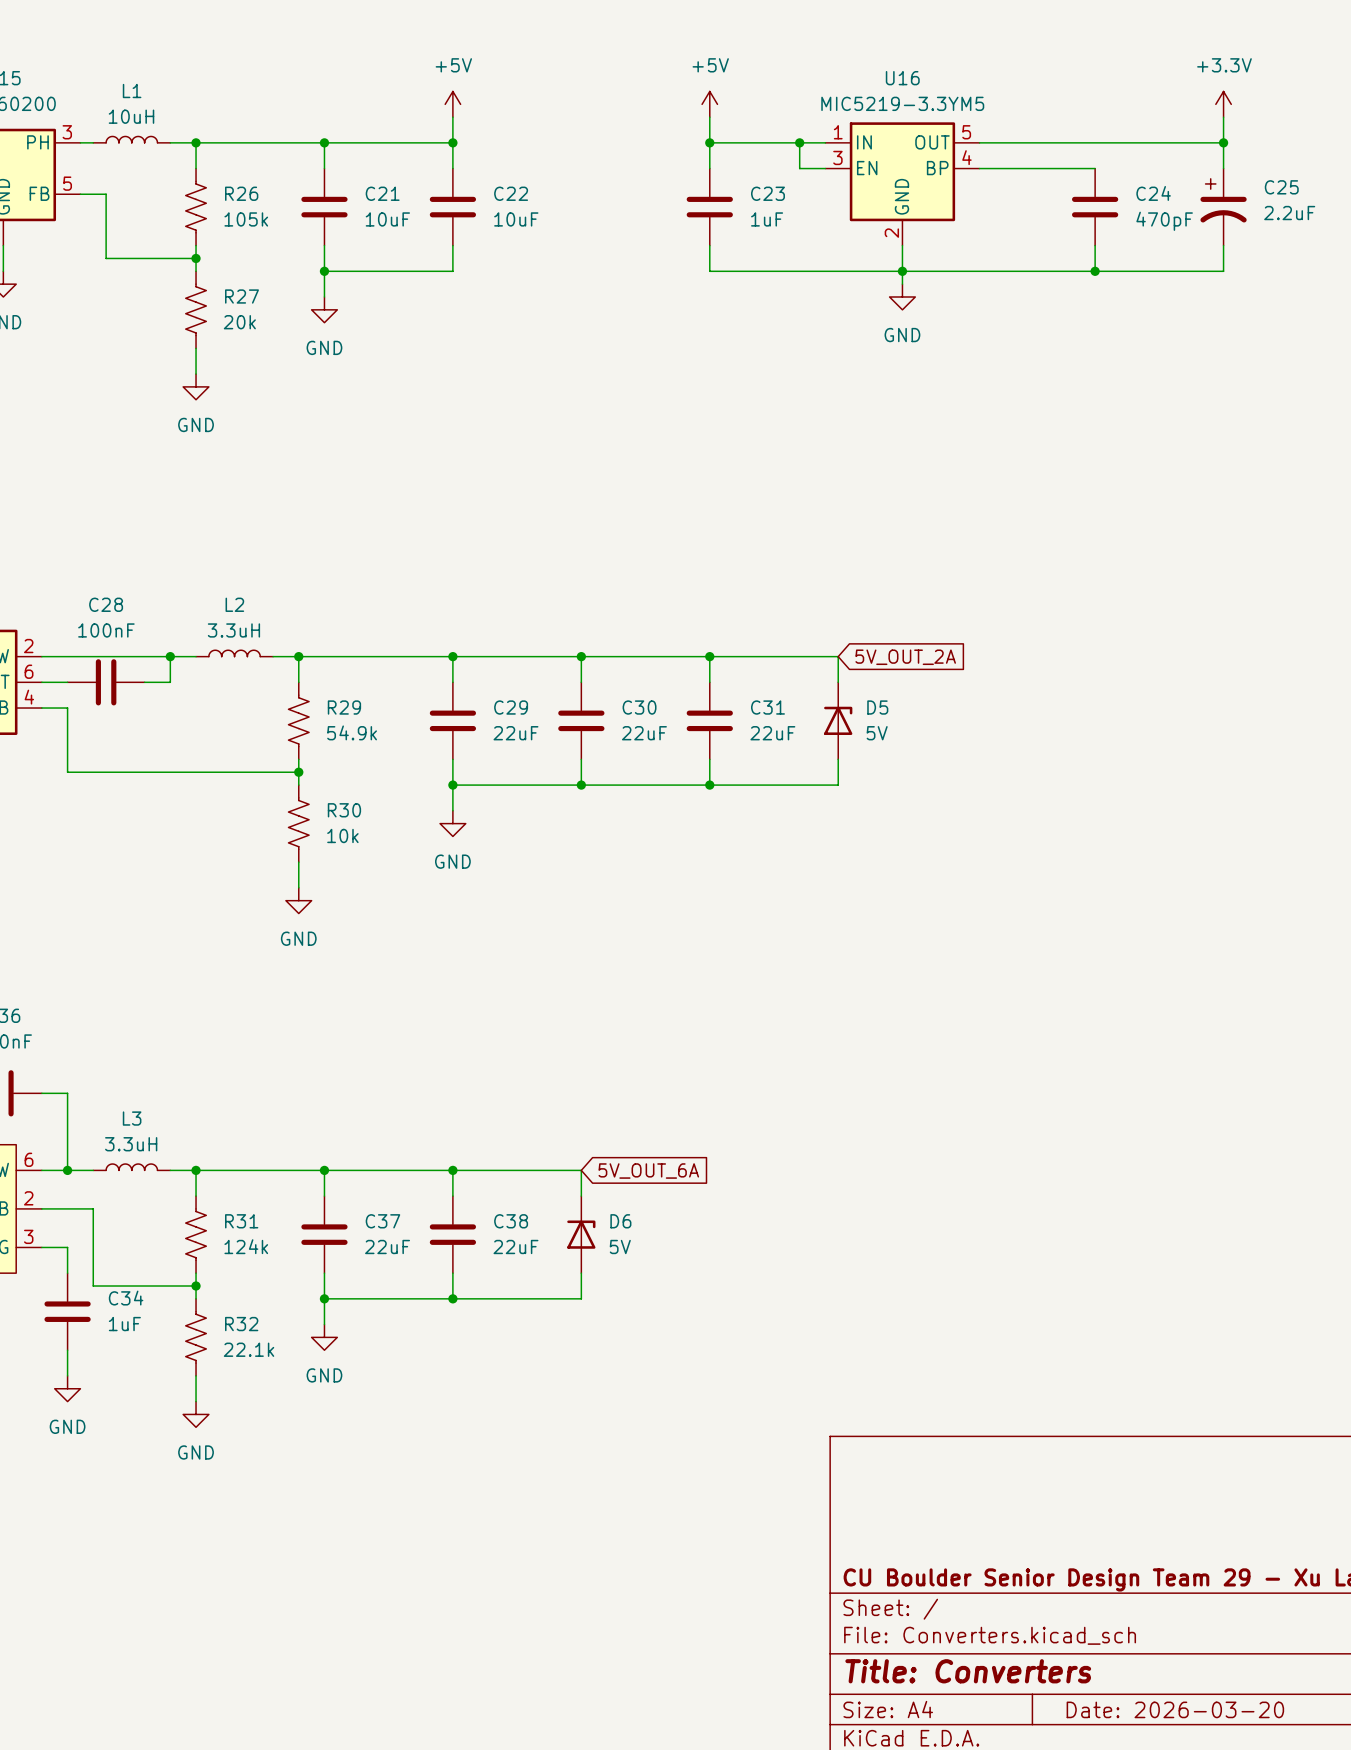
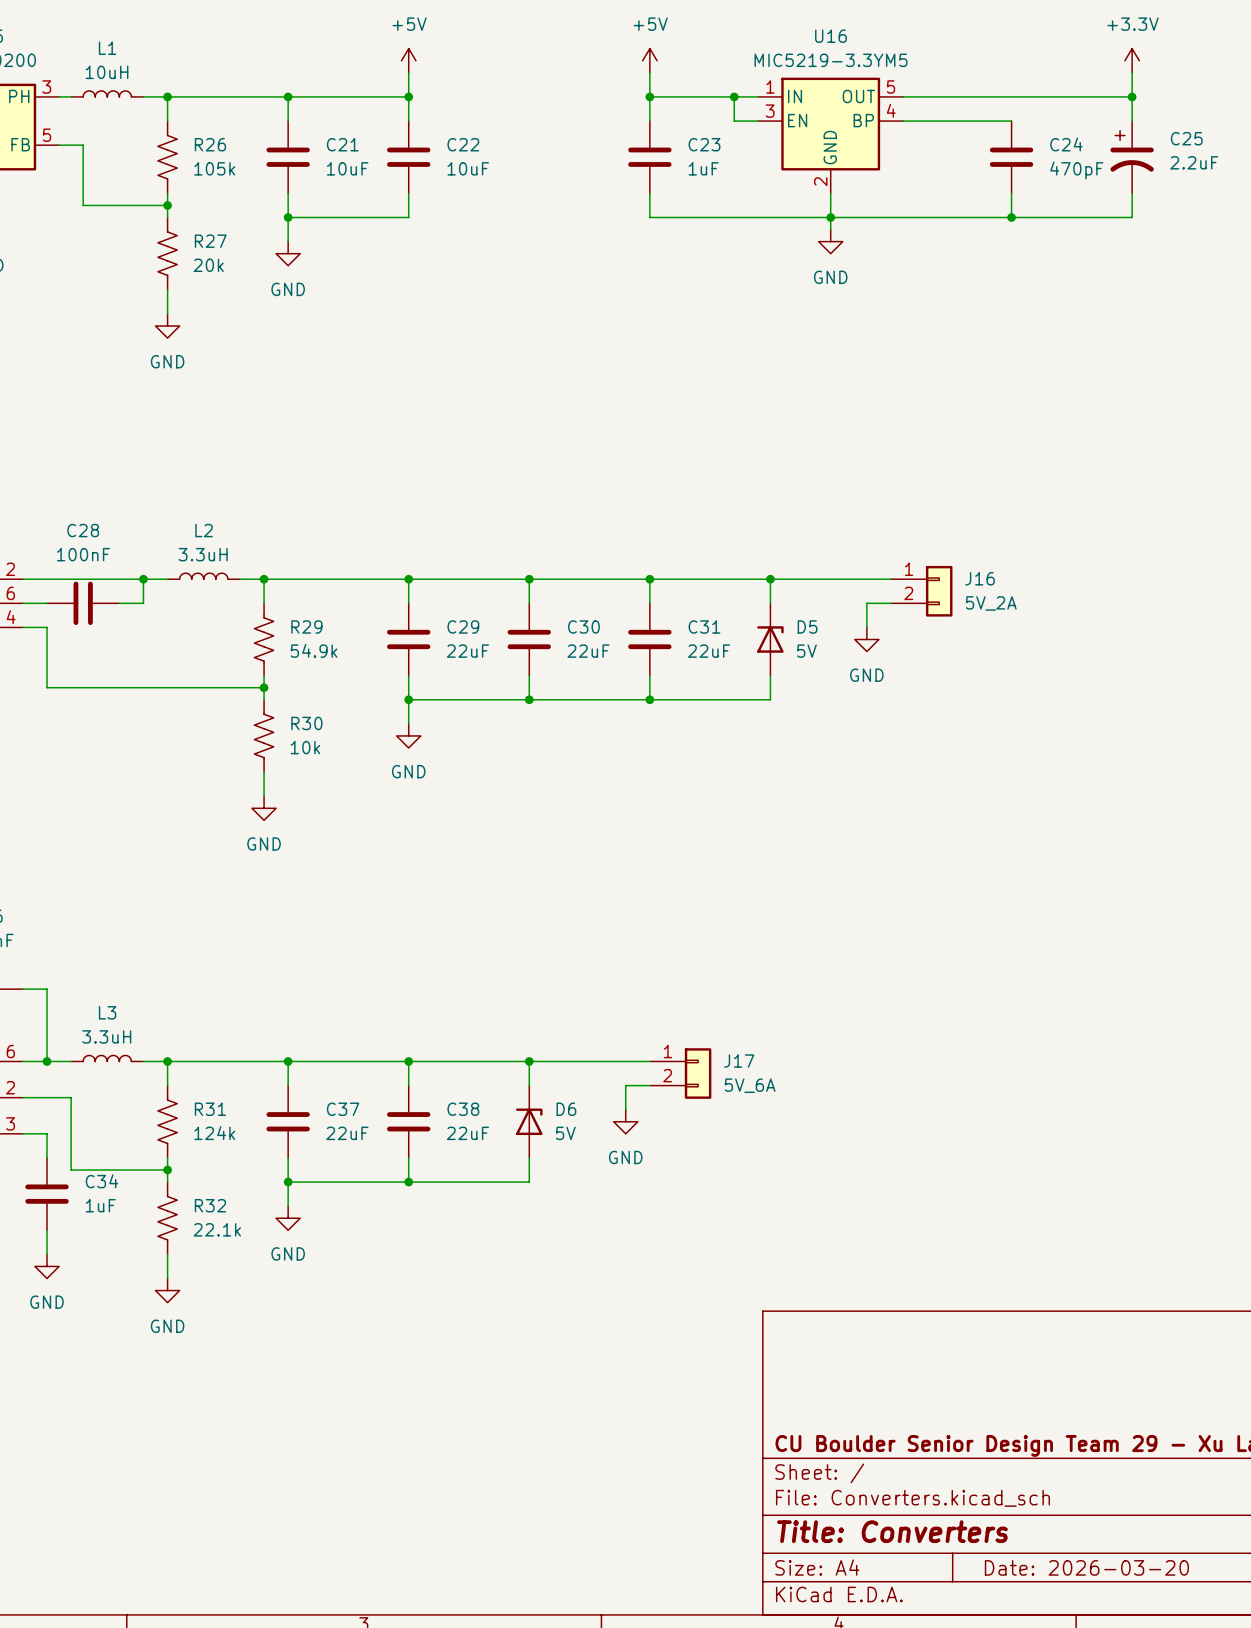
wire: none -> (770, 579) (890, 579)
junction: none -> (770, 579)
global label: 5V_OUT_2A (905, 657) -> none
J16: none -> 5V_2A (921, 591)
wire: none -> (890, 603) (866, 603) (866, 627)
power symbol: none -> GND (866, 639)
wire: none -> (529, 1061) (649, 1061)
junction: none -> (529, 1061)
global label: 5V_OUT_6A (648, 1171) -> none
J17: none -> 5V_6A (680, 1073)
wire: none -> (649, 1085) (625, 1085) (625, 1109)
power symbol: none -> GND (625, 1121)

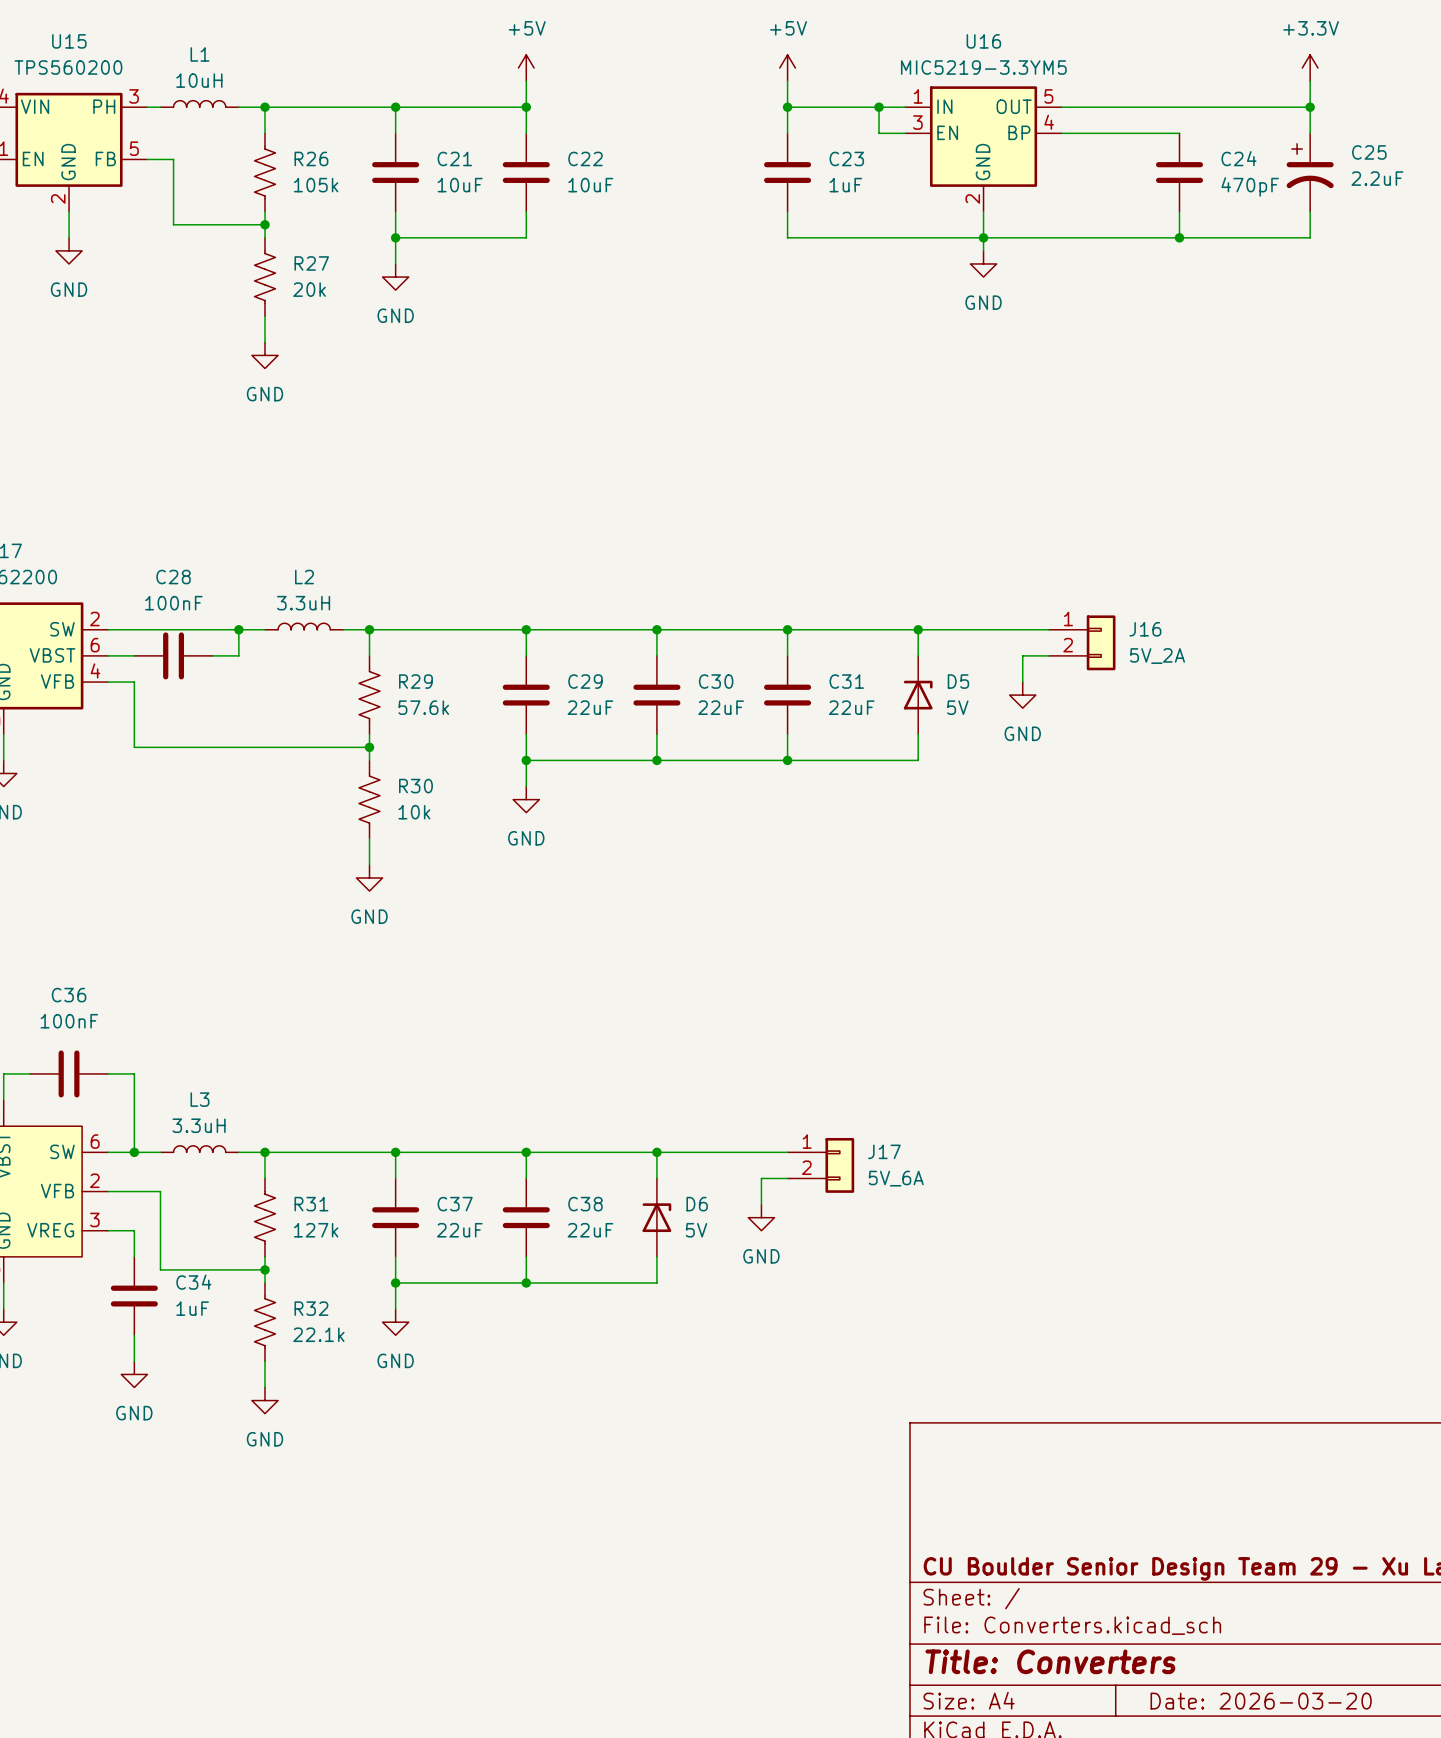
R29 value: 54.9k (314, 650) -> 57.6k (423, 707)
R31 value: 124k (214, 1133) -> 127k (316, 1230)

